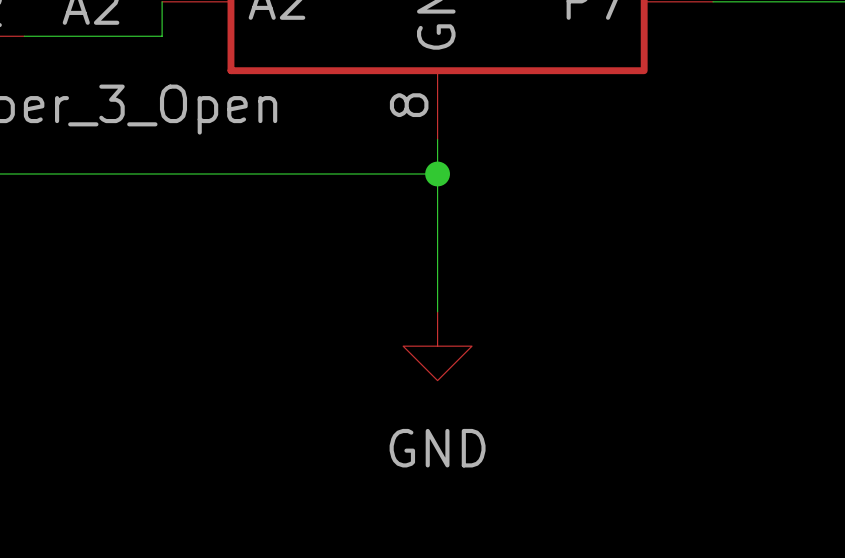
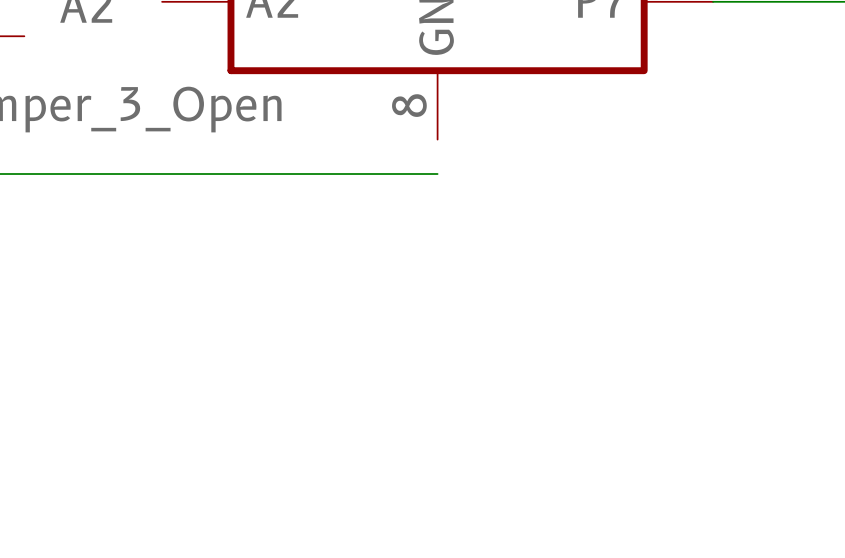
wire: (162, 1) (162, 36) (24, 36) -> none
wire: (437, 139) (437, 311) -> none
junction: (437, 174) -> none
power symbol: GND (437, 346) -> none

